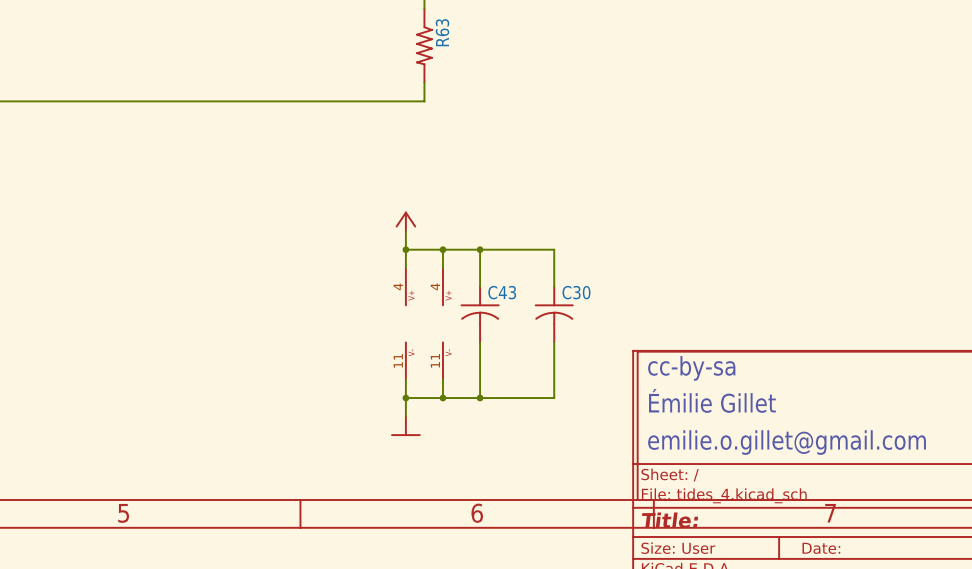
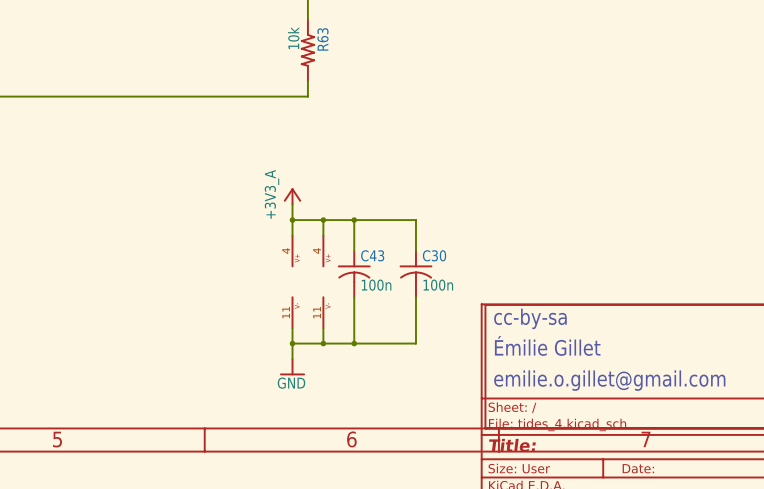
R63 value: none -> 10k (293, 38)
power symbol text: none -> +3V3_A (271, 194)
C43 value: none -> 100n (376, 285)
C30 value: none -> 100n (438, 285)
power symbol text: none -> GND (291, 383)

